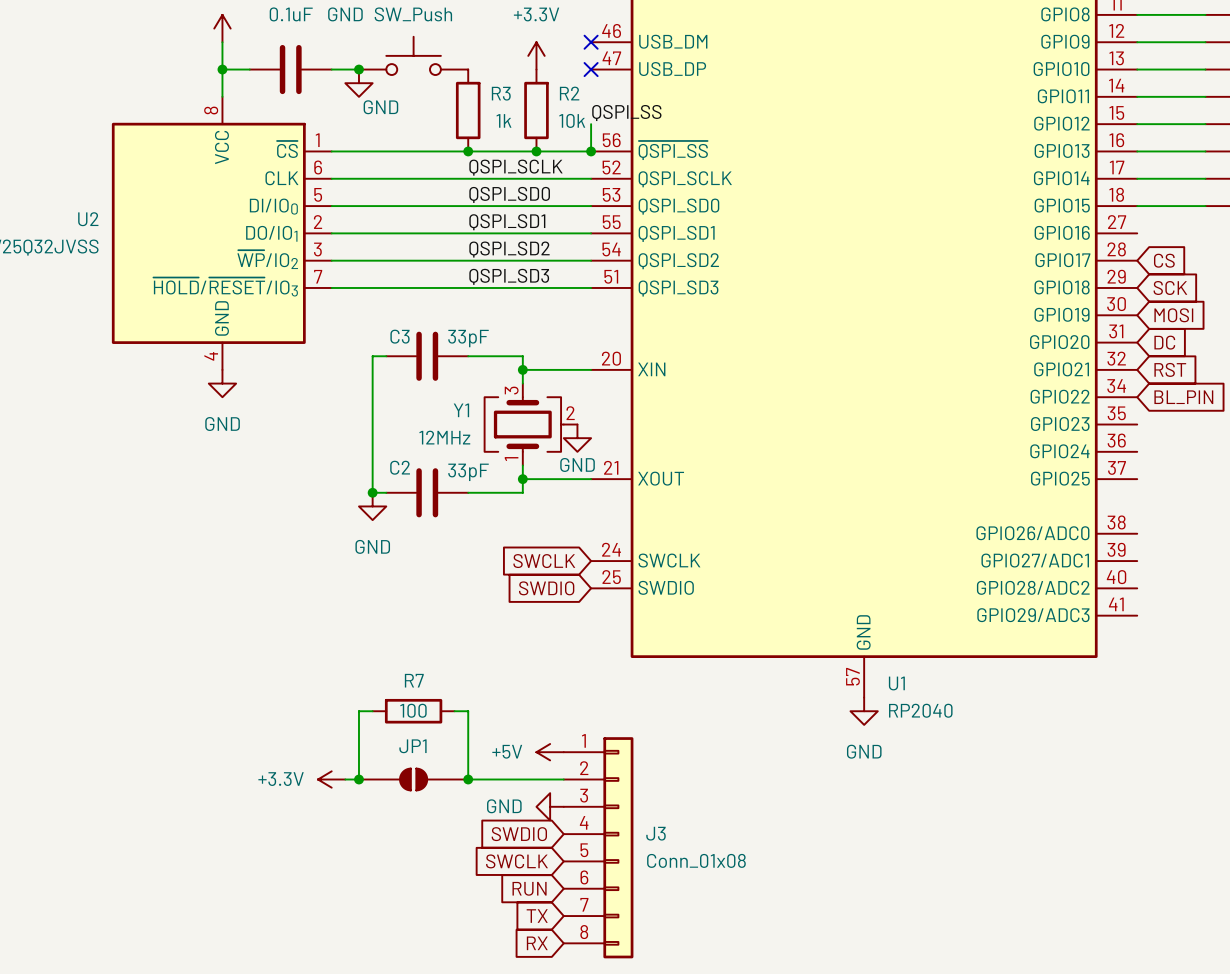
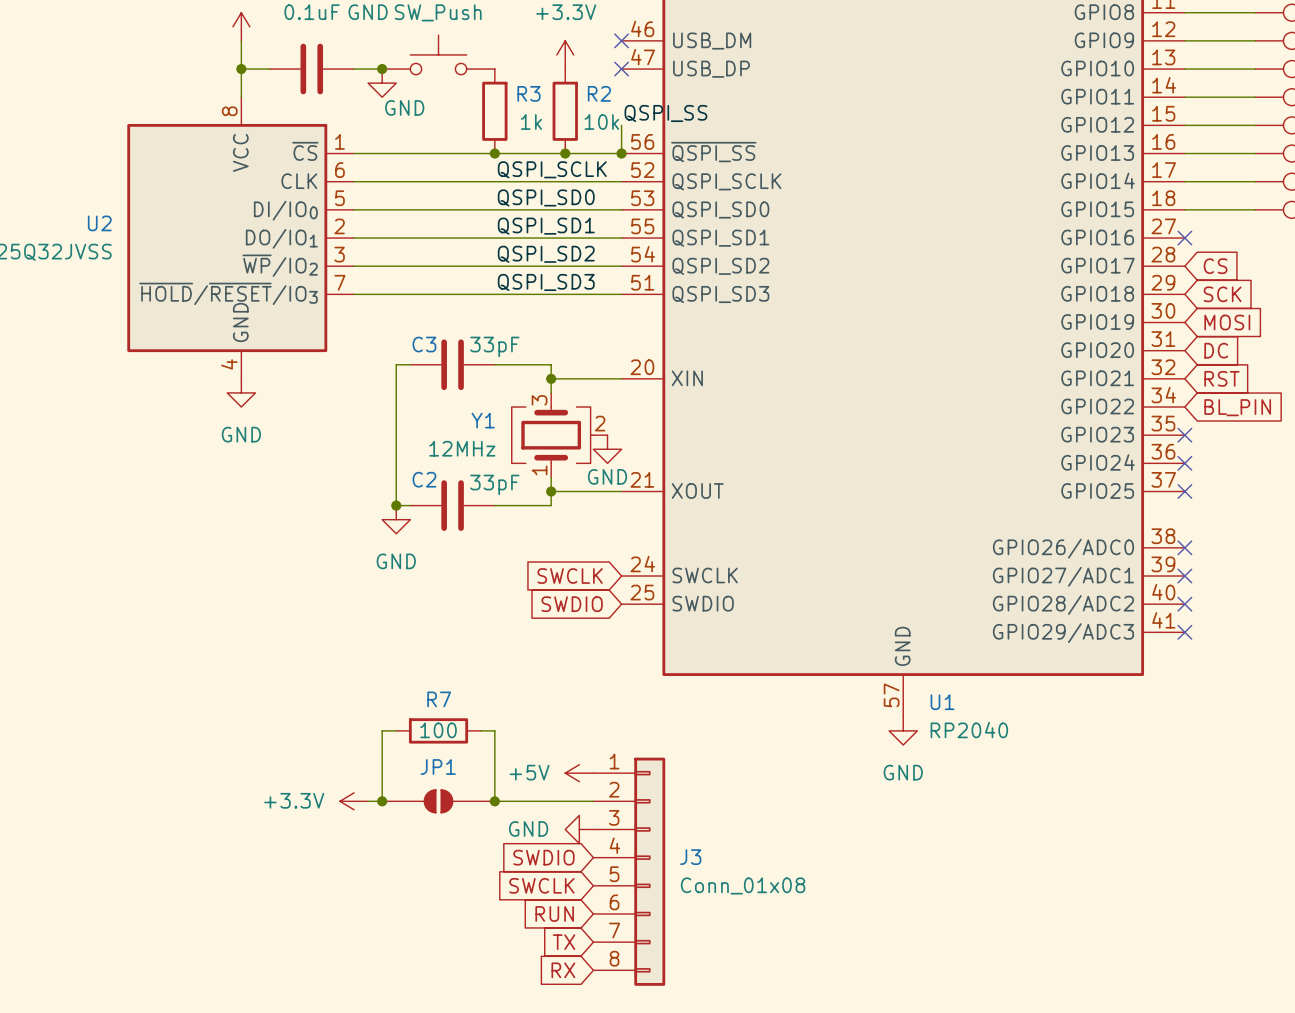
no-connect mark: none -> (1184, 238)
no-connect mark: none -> (1184, 435)
no-connect mark: none -> (1184, 463)
no-connect mark: none -> (1184, 491)
no-connect mark: none -> (1184, 547)
no-connect mark: none -> (1184, 576)
no-connect mark: none -> (1184, 604)
no-connect mark: none -> (1184, 632)

